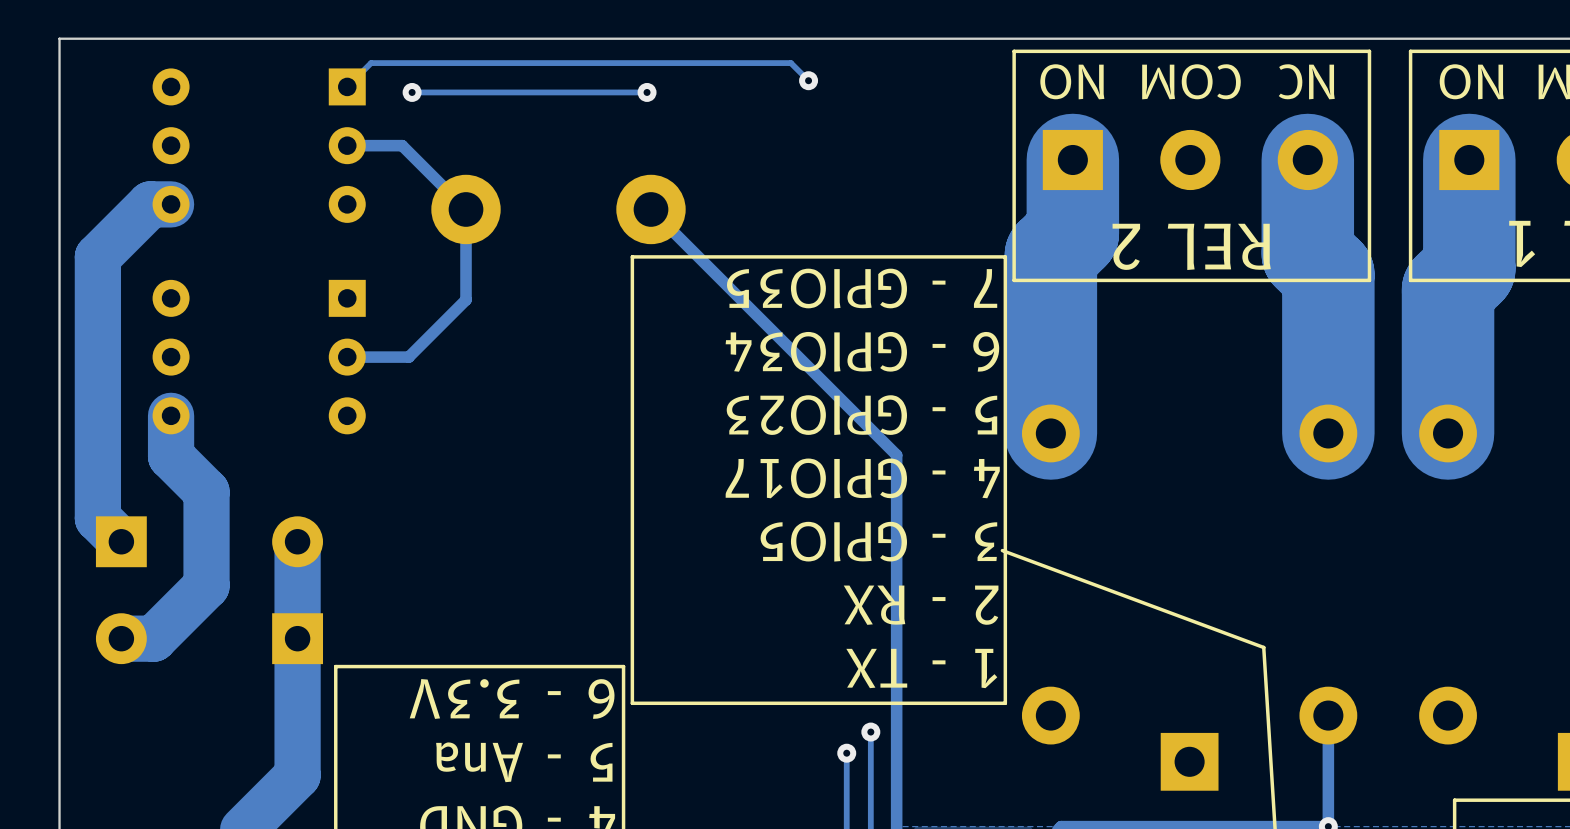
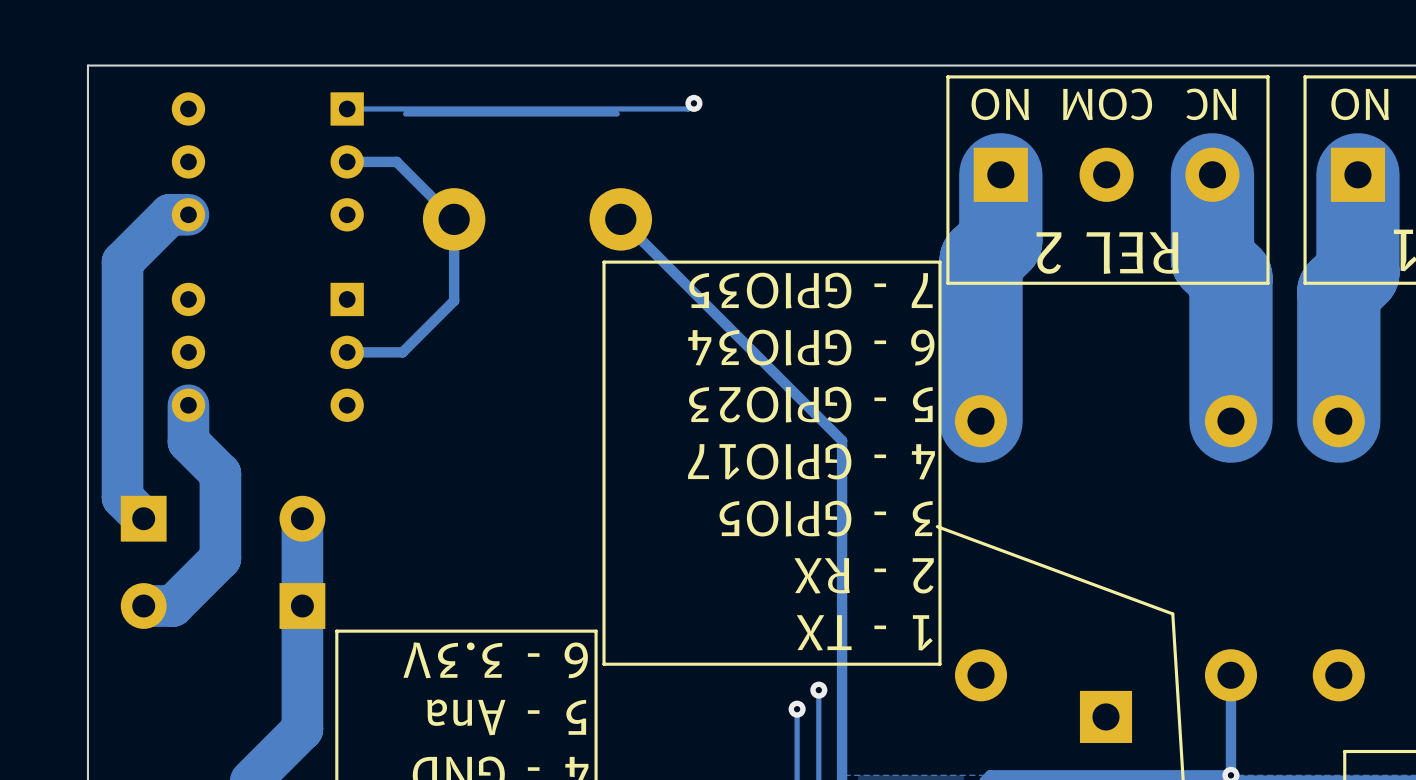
via: none -> (693, 103)
track: (808, 80) (790, 63) (371, 63) (347, 86) -> (693, 103) (688, 108) (347, 108)
via: (808, 80) -> none
via: (412, 92) -> none
via: (647, 92) -> none

